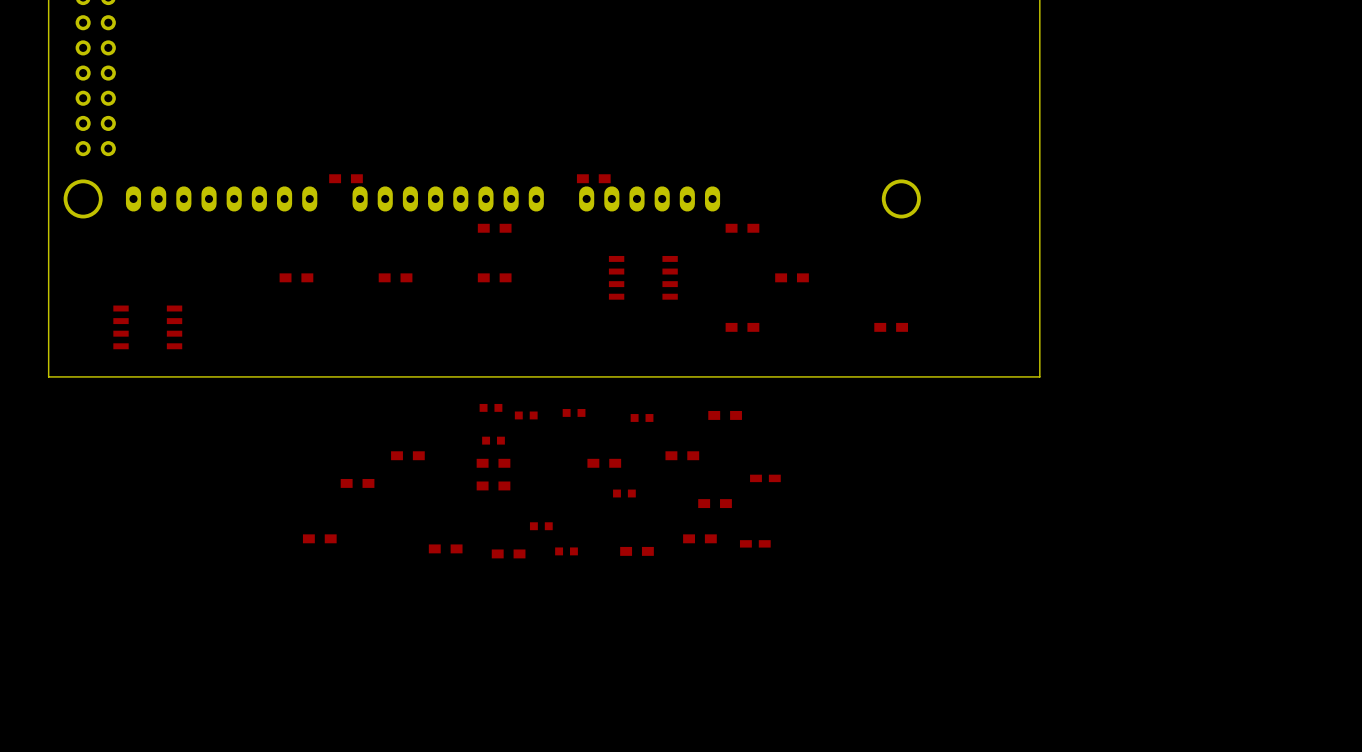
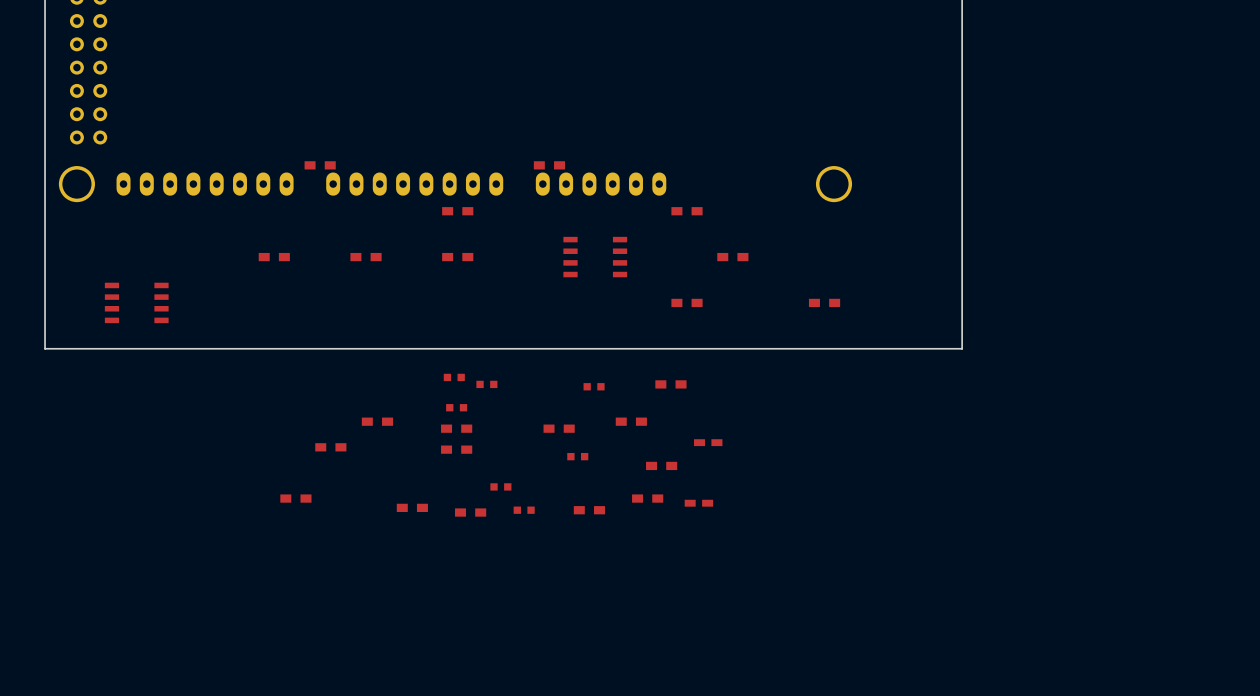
part: (574, 412) -> none

